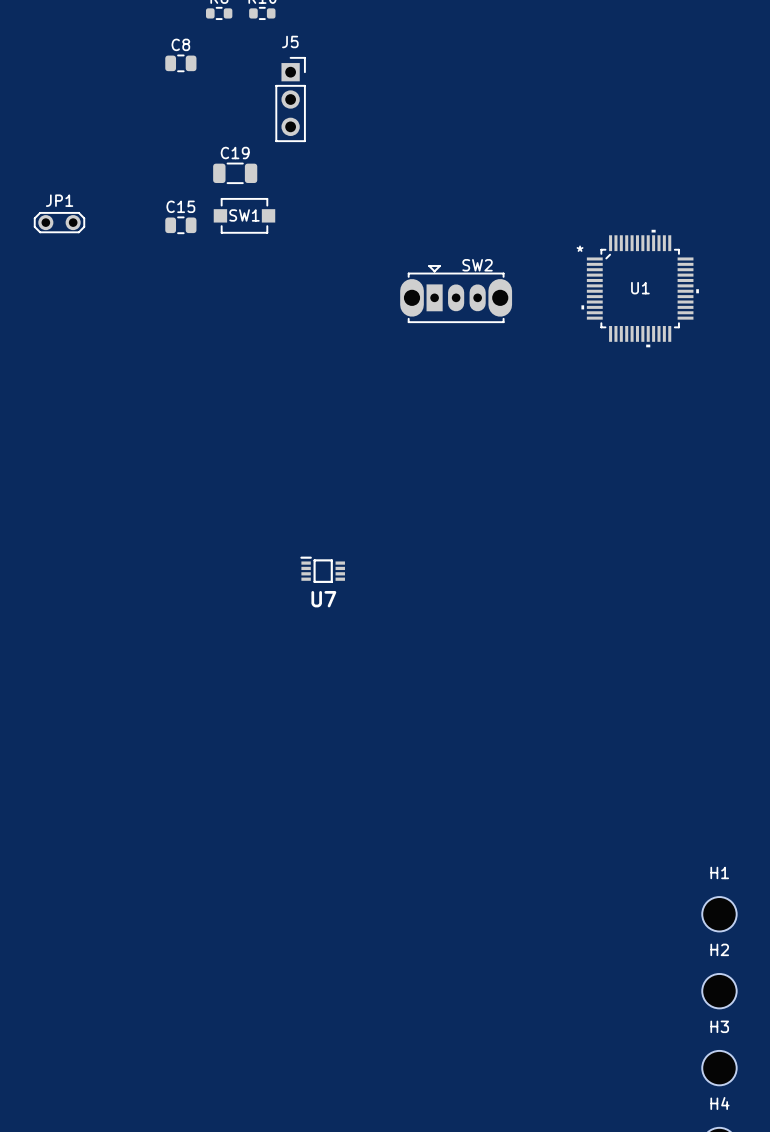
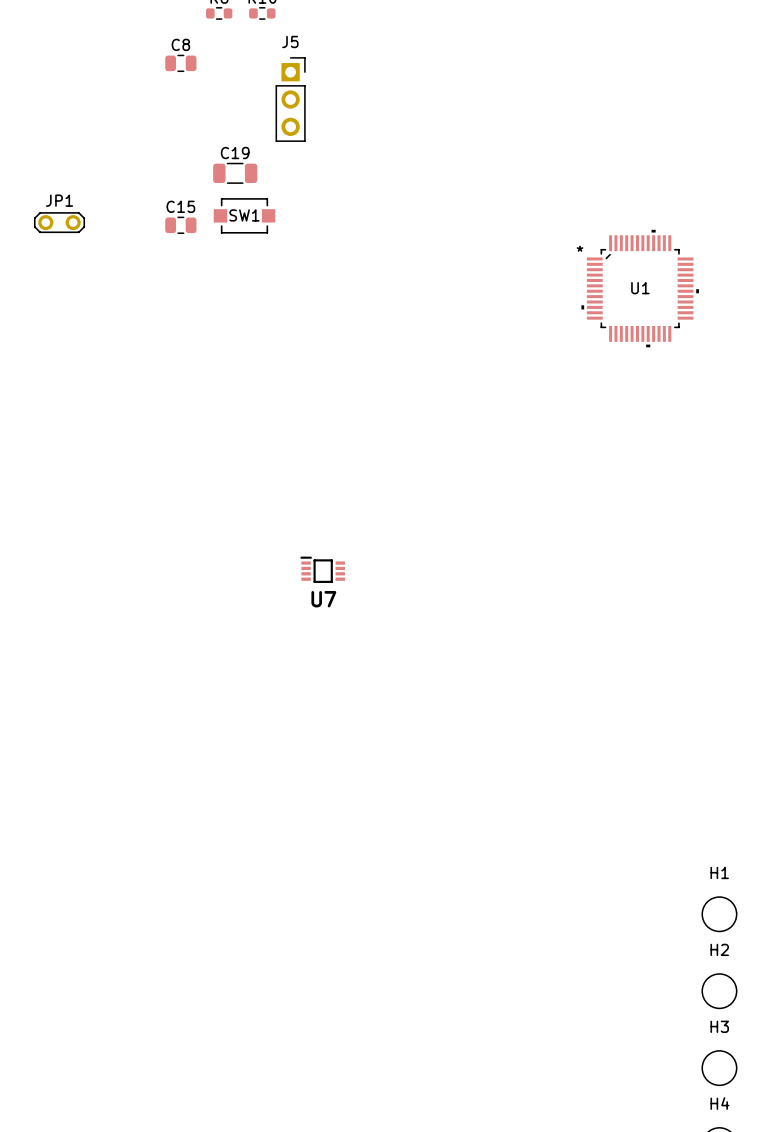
SW2: (456, 294) -> none

